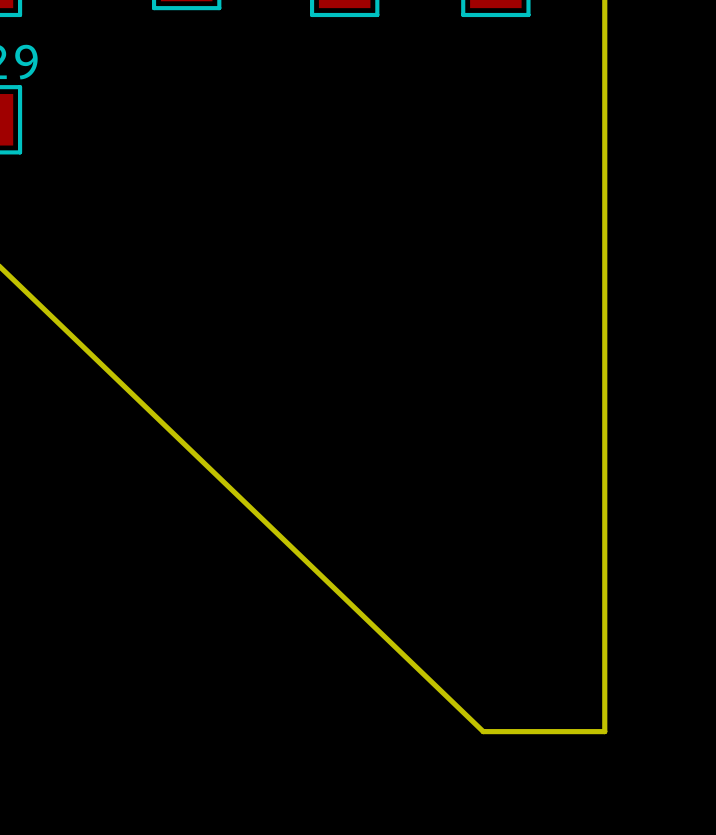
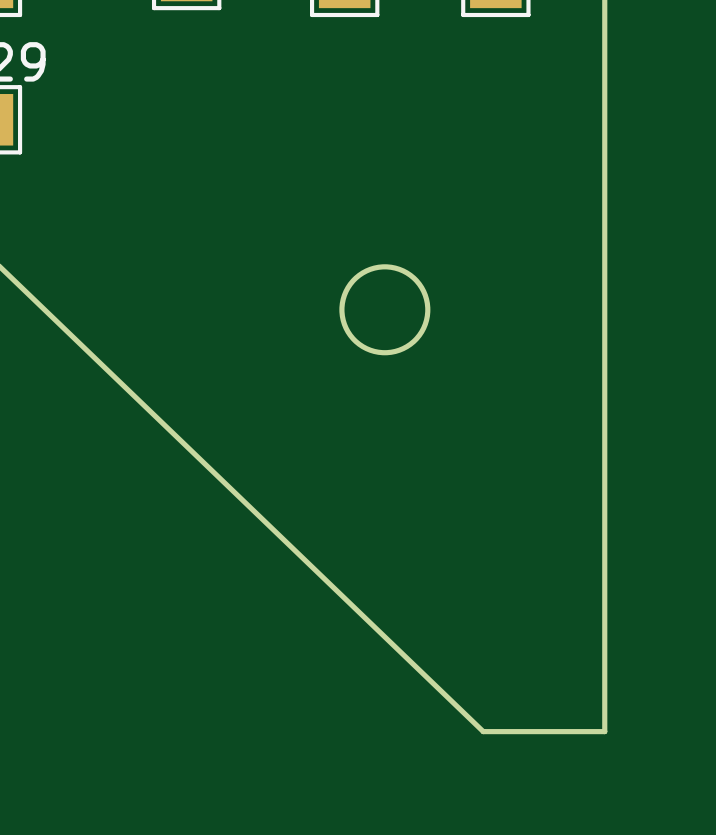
round board edge: none -> [339, 264, 431, 356]

